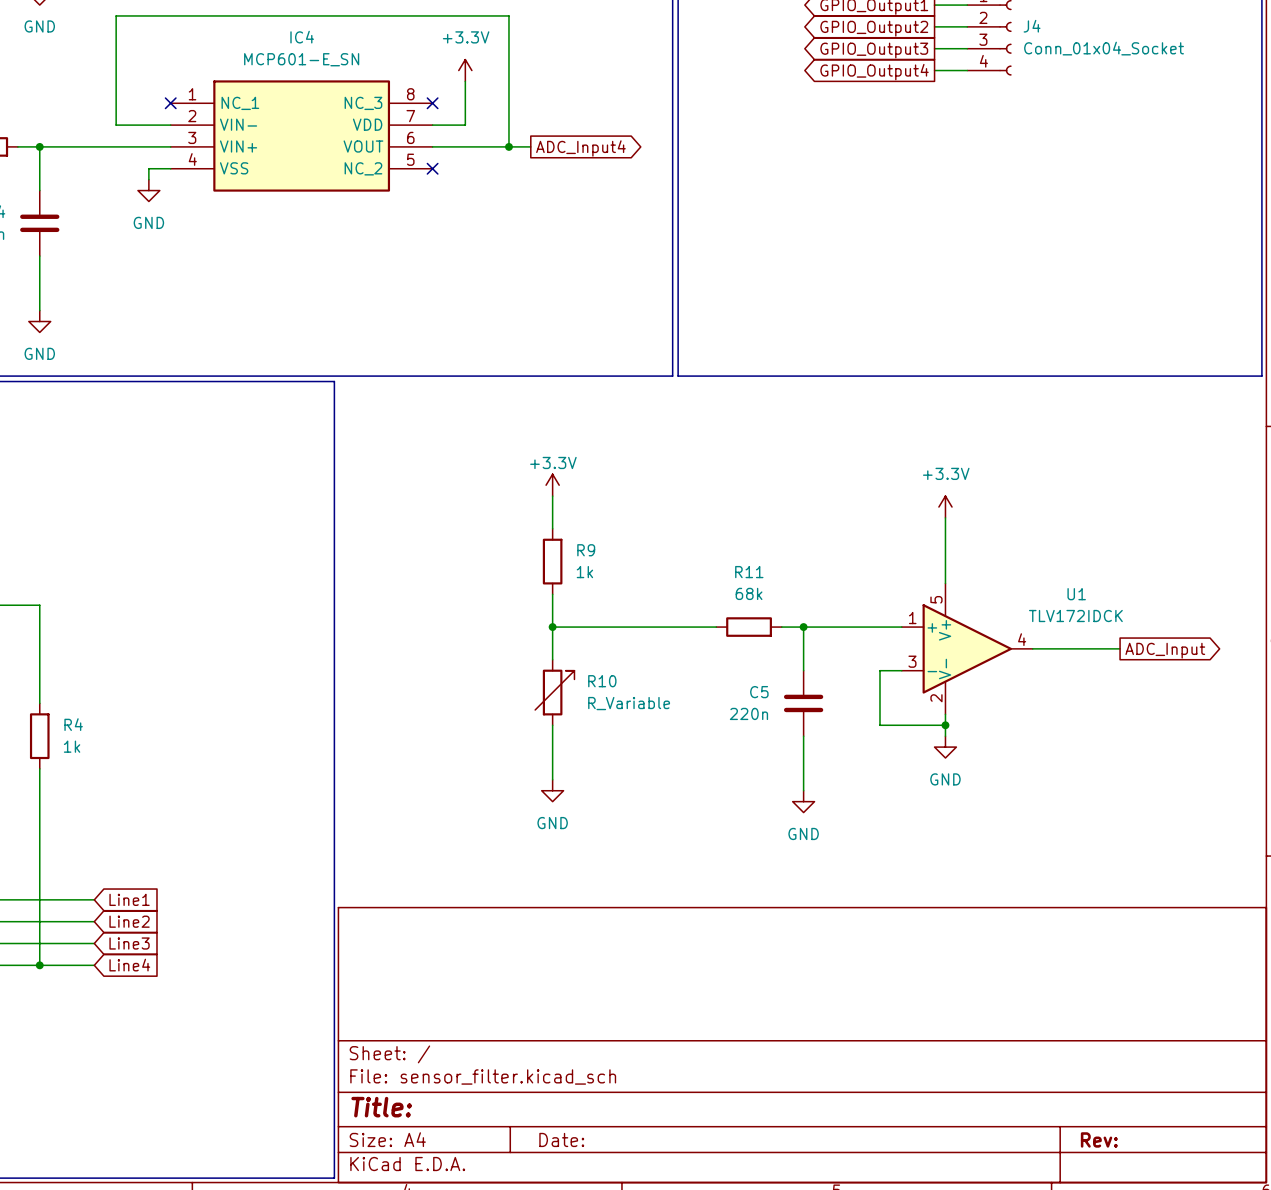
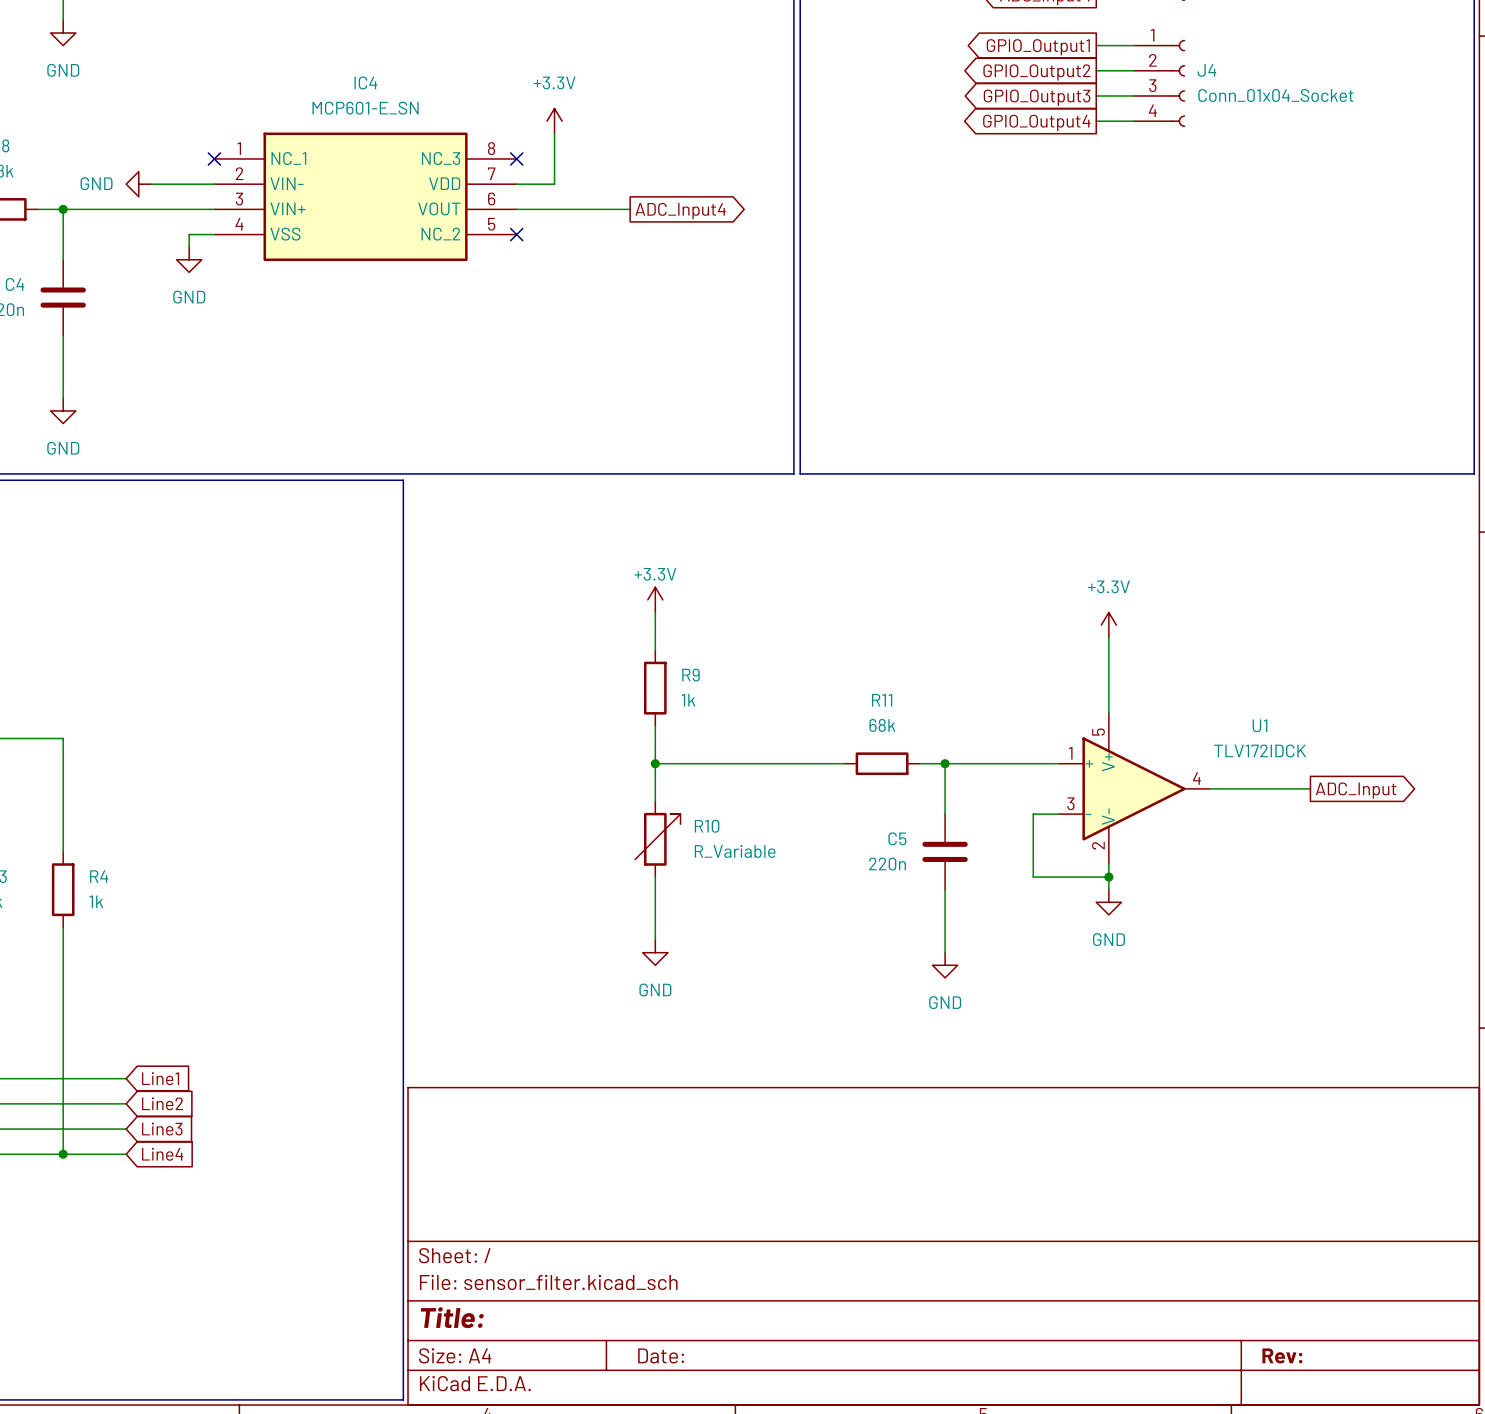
power symbol: none -> GND (138, 184)
wire: (116, 125) (116, 15) (508, 15) (508, 146) -> none
junction: (508, 146) -> none

